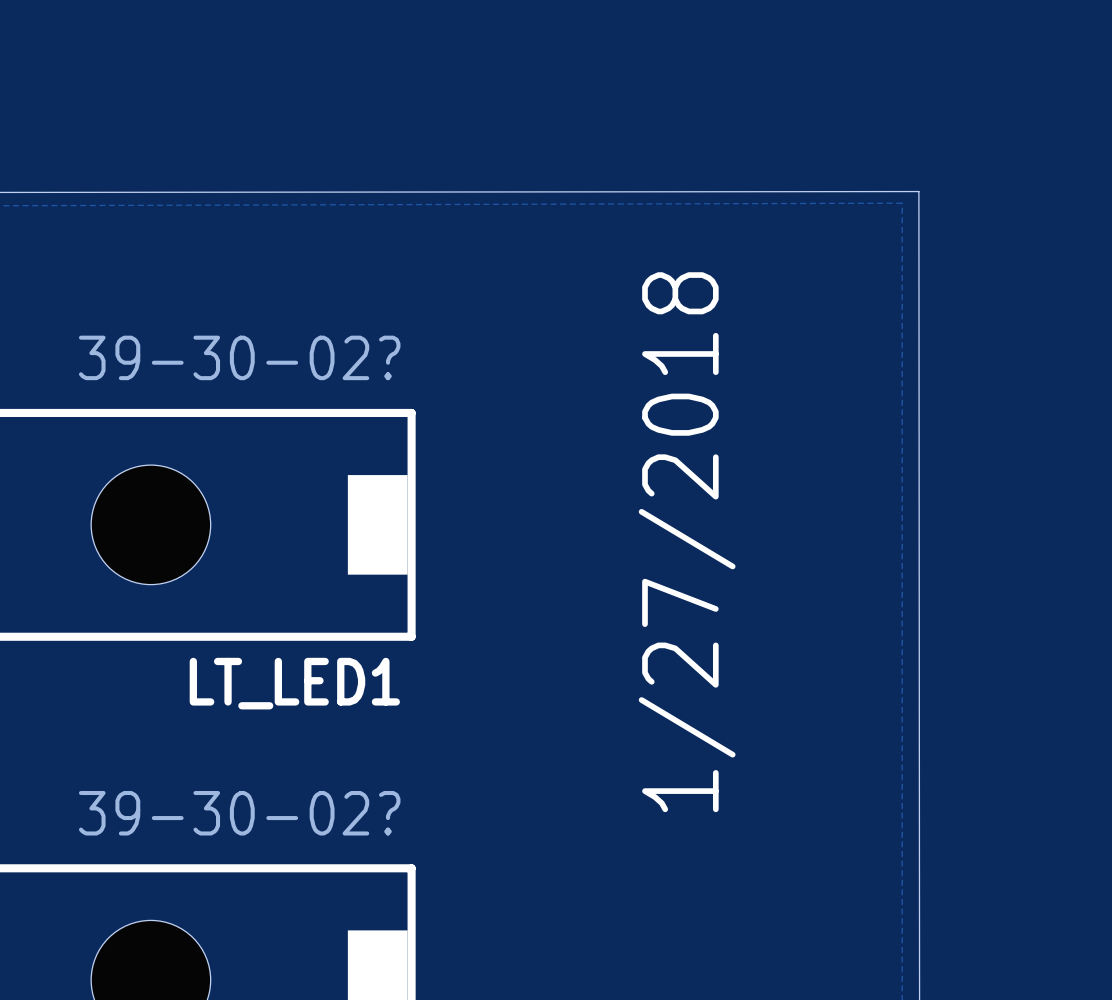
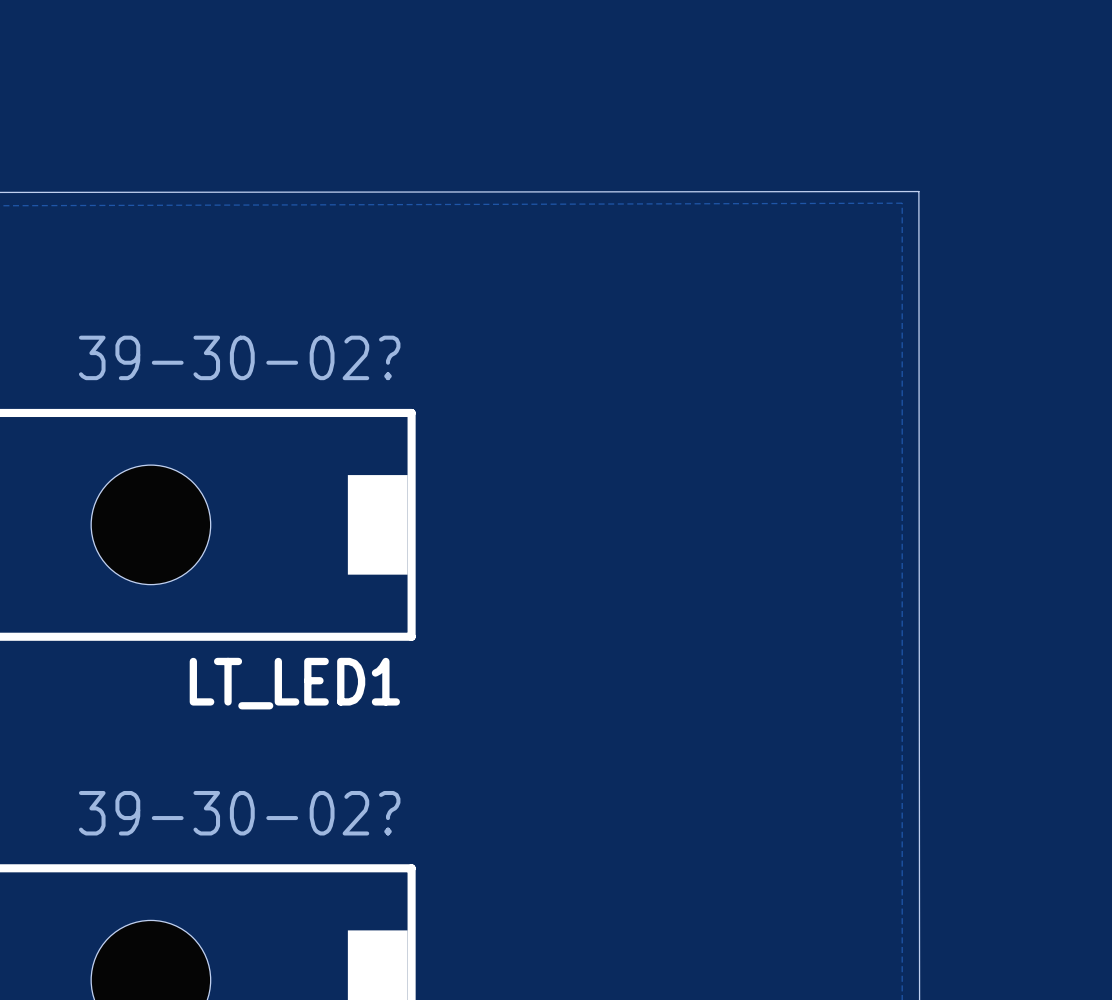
text: 1/27/2018 (687, 542) -> none

